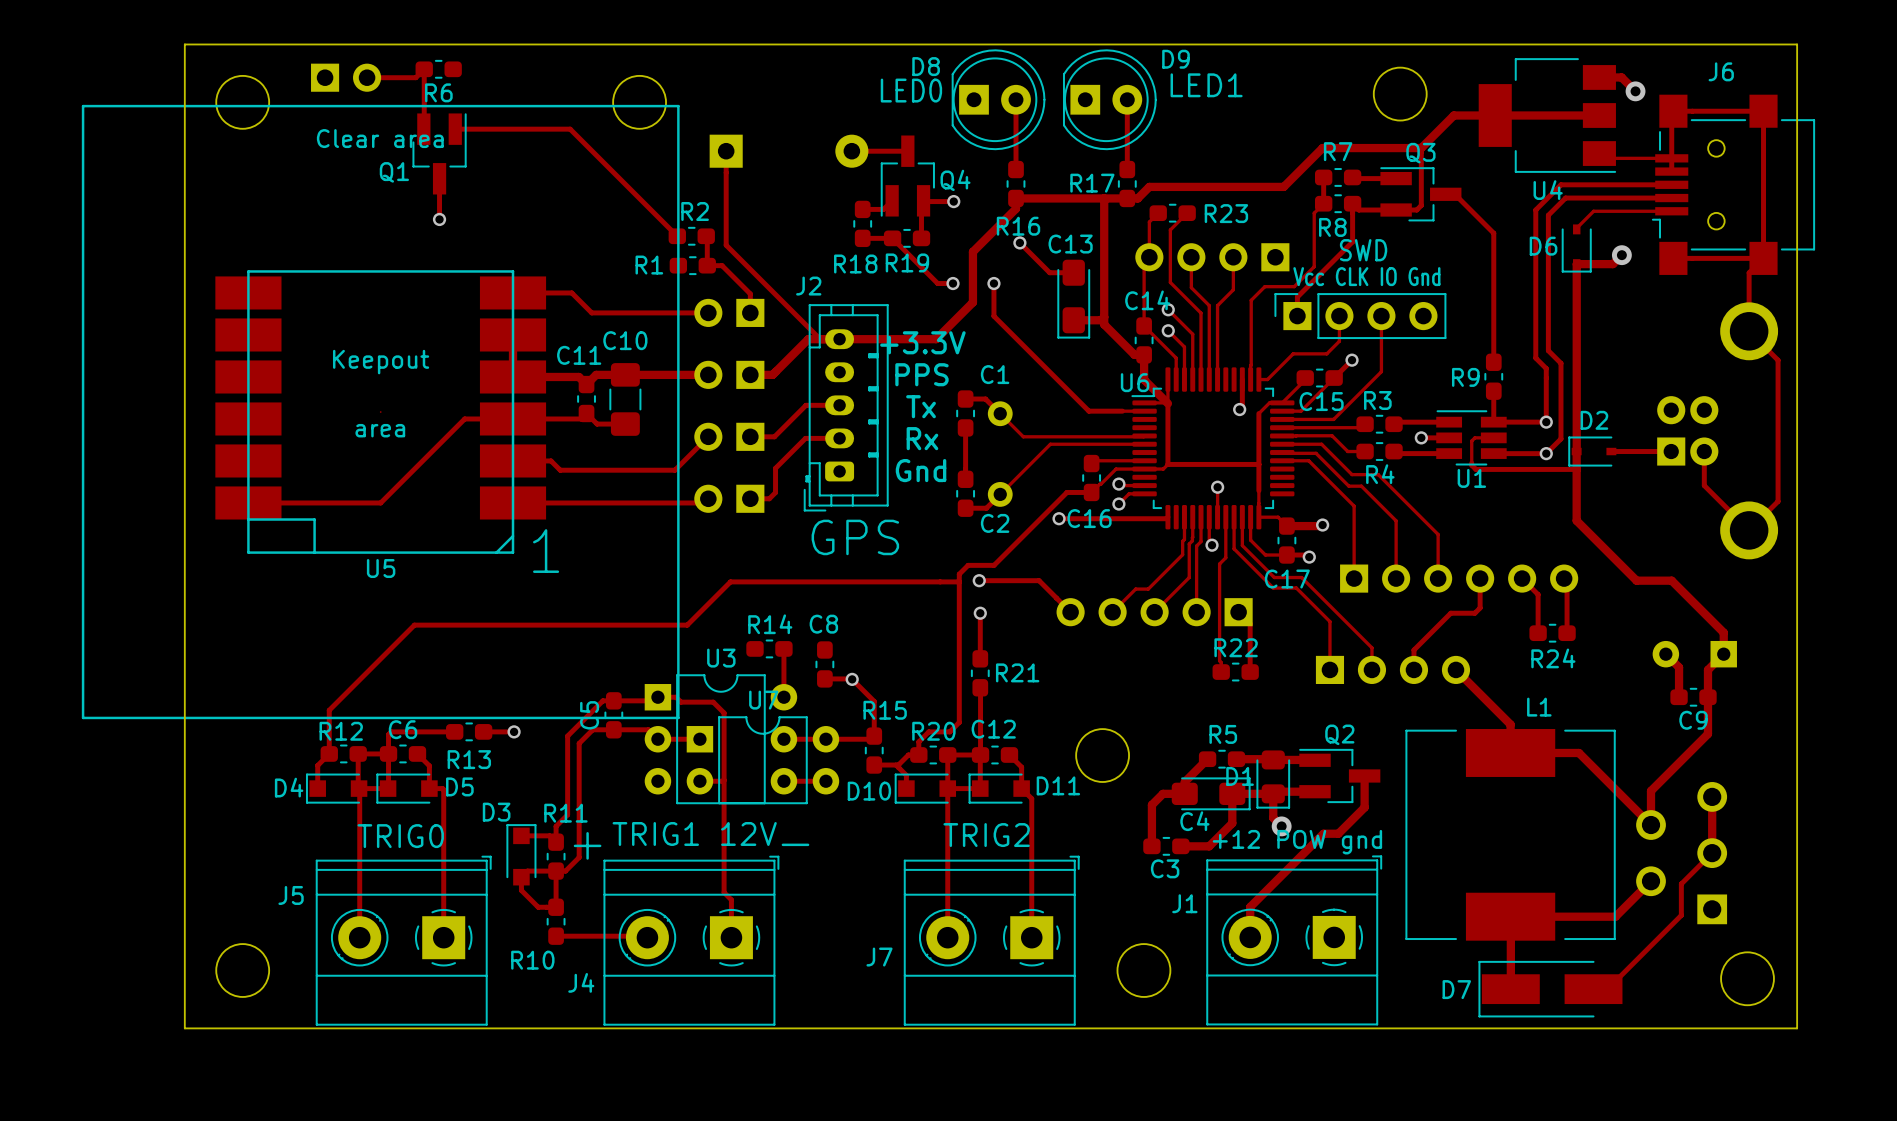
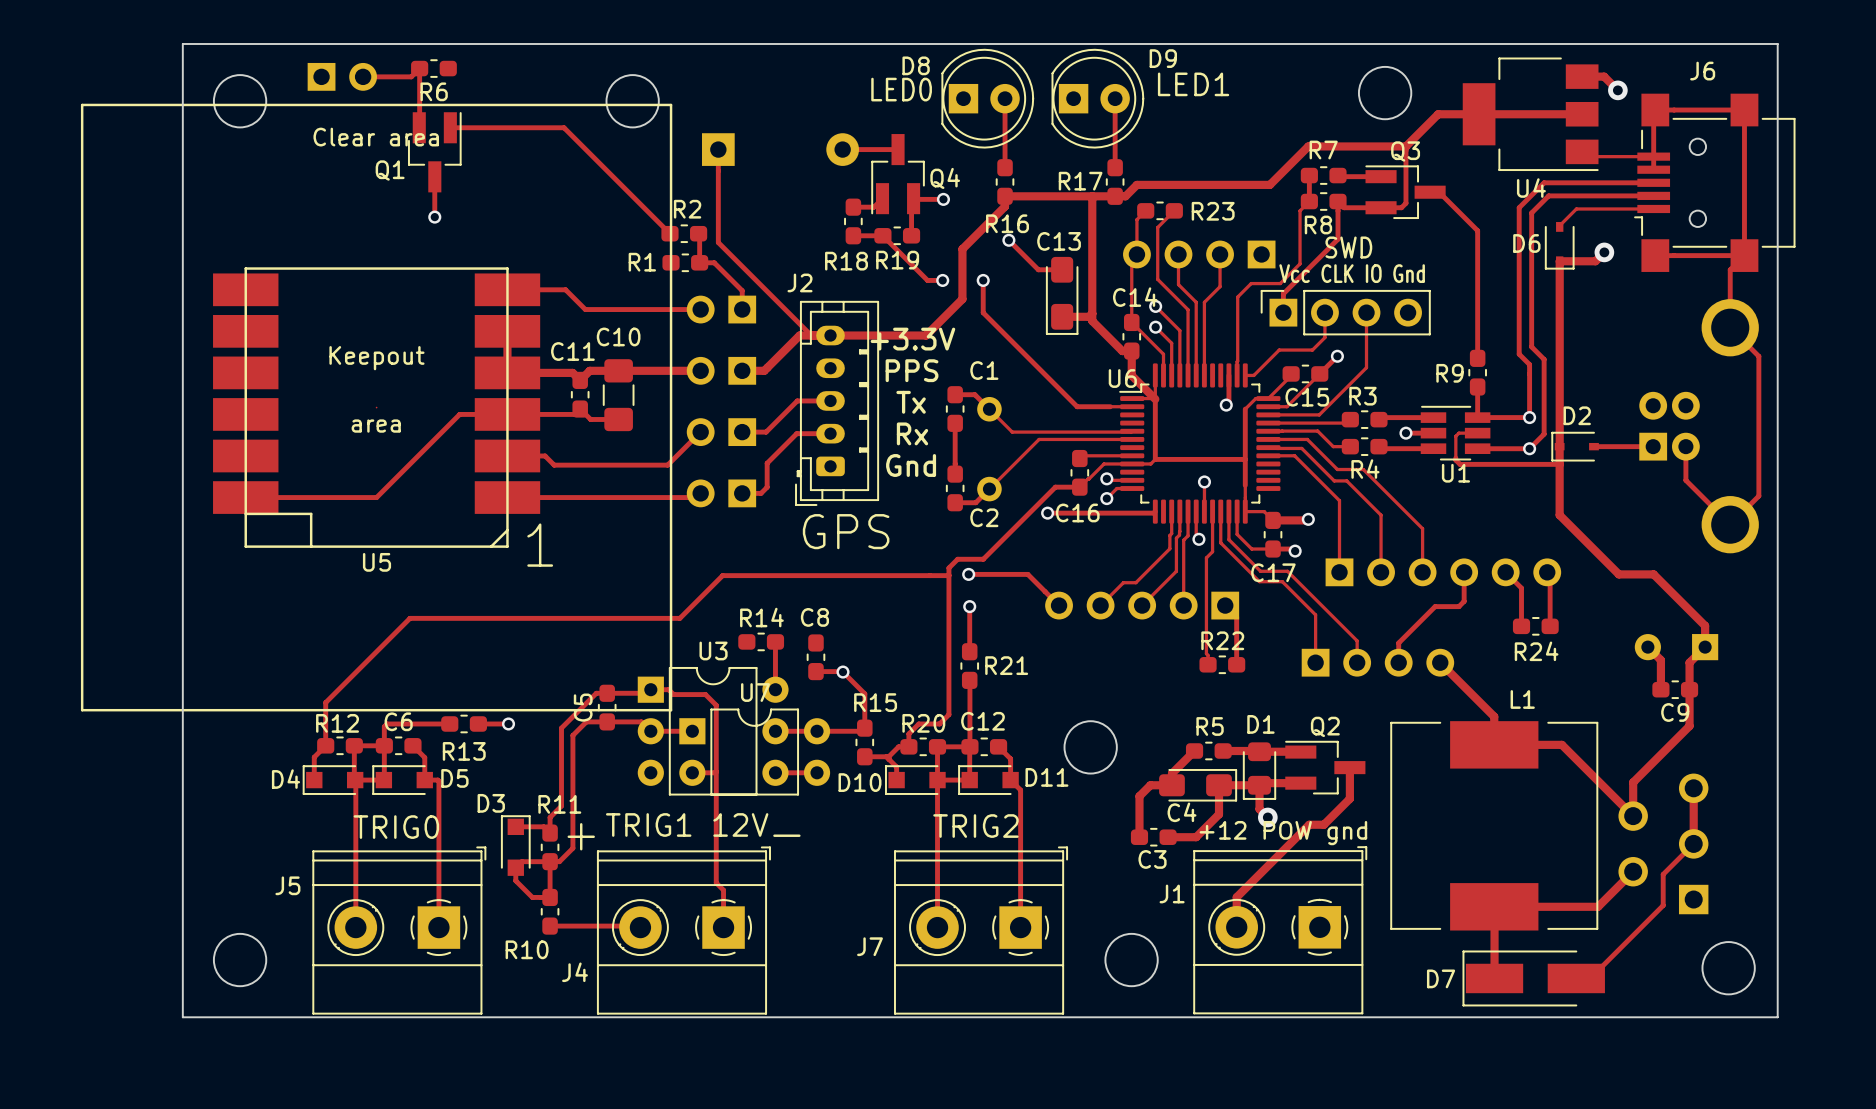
D1 name position: D1 (1240, 776) -> D1 (1260, 724)

